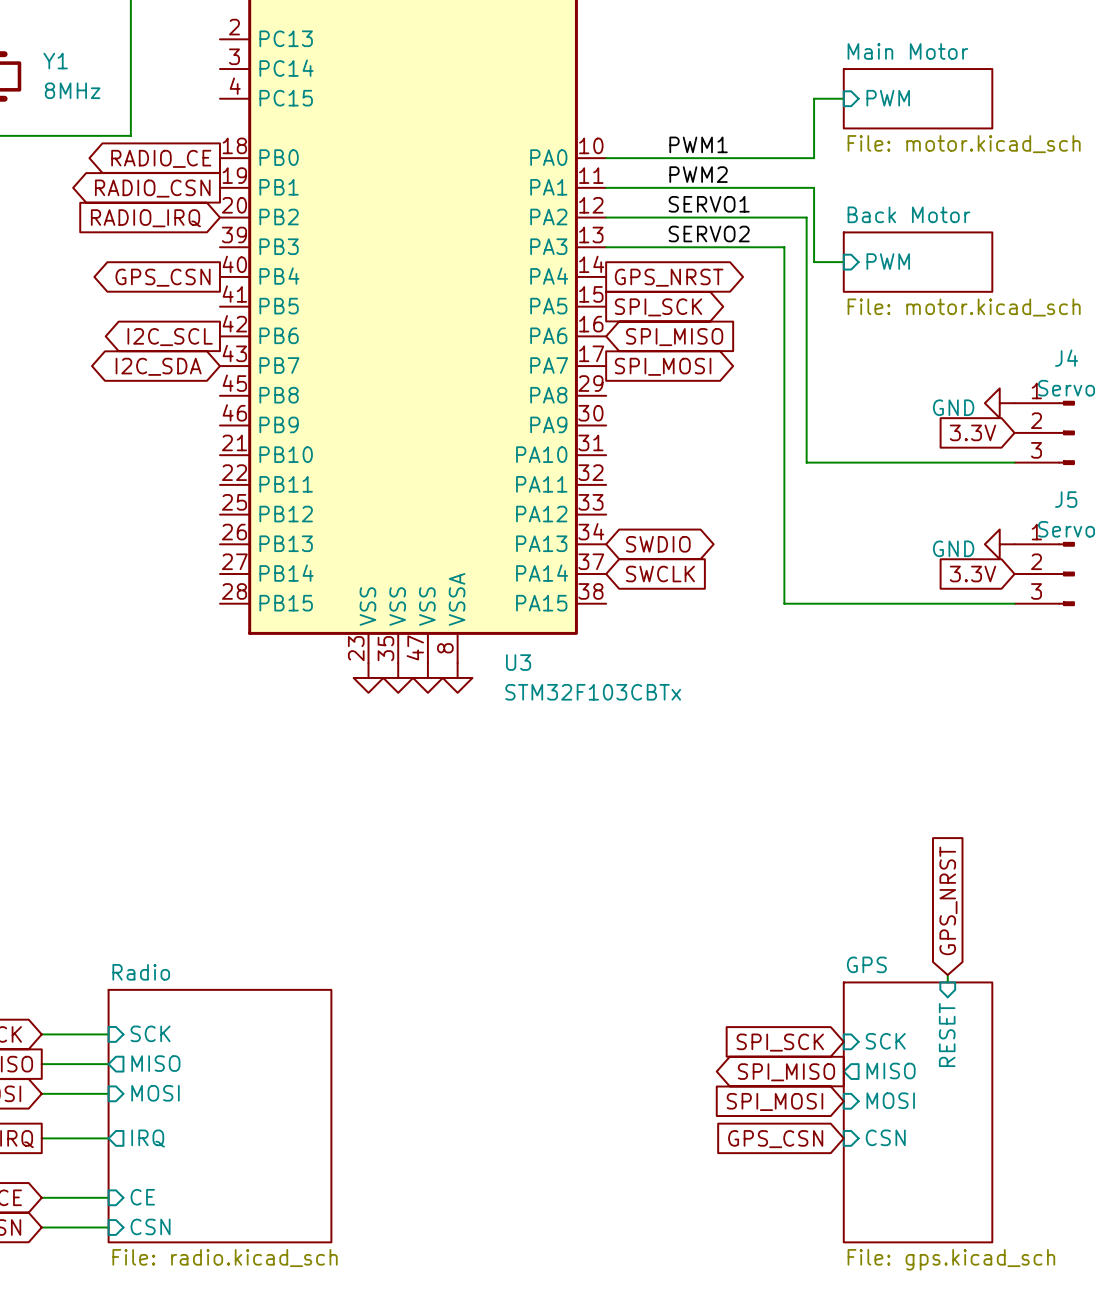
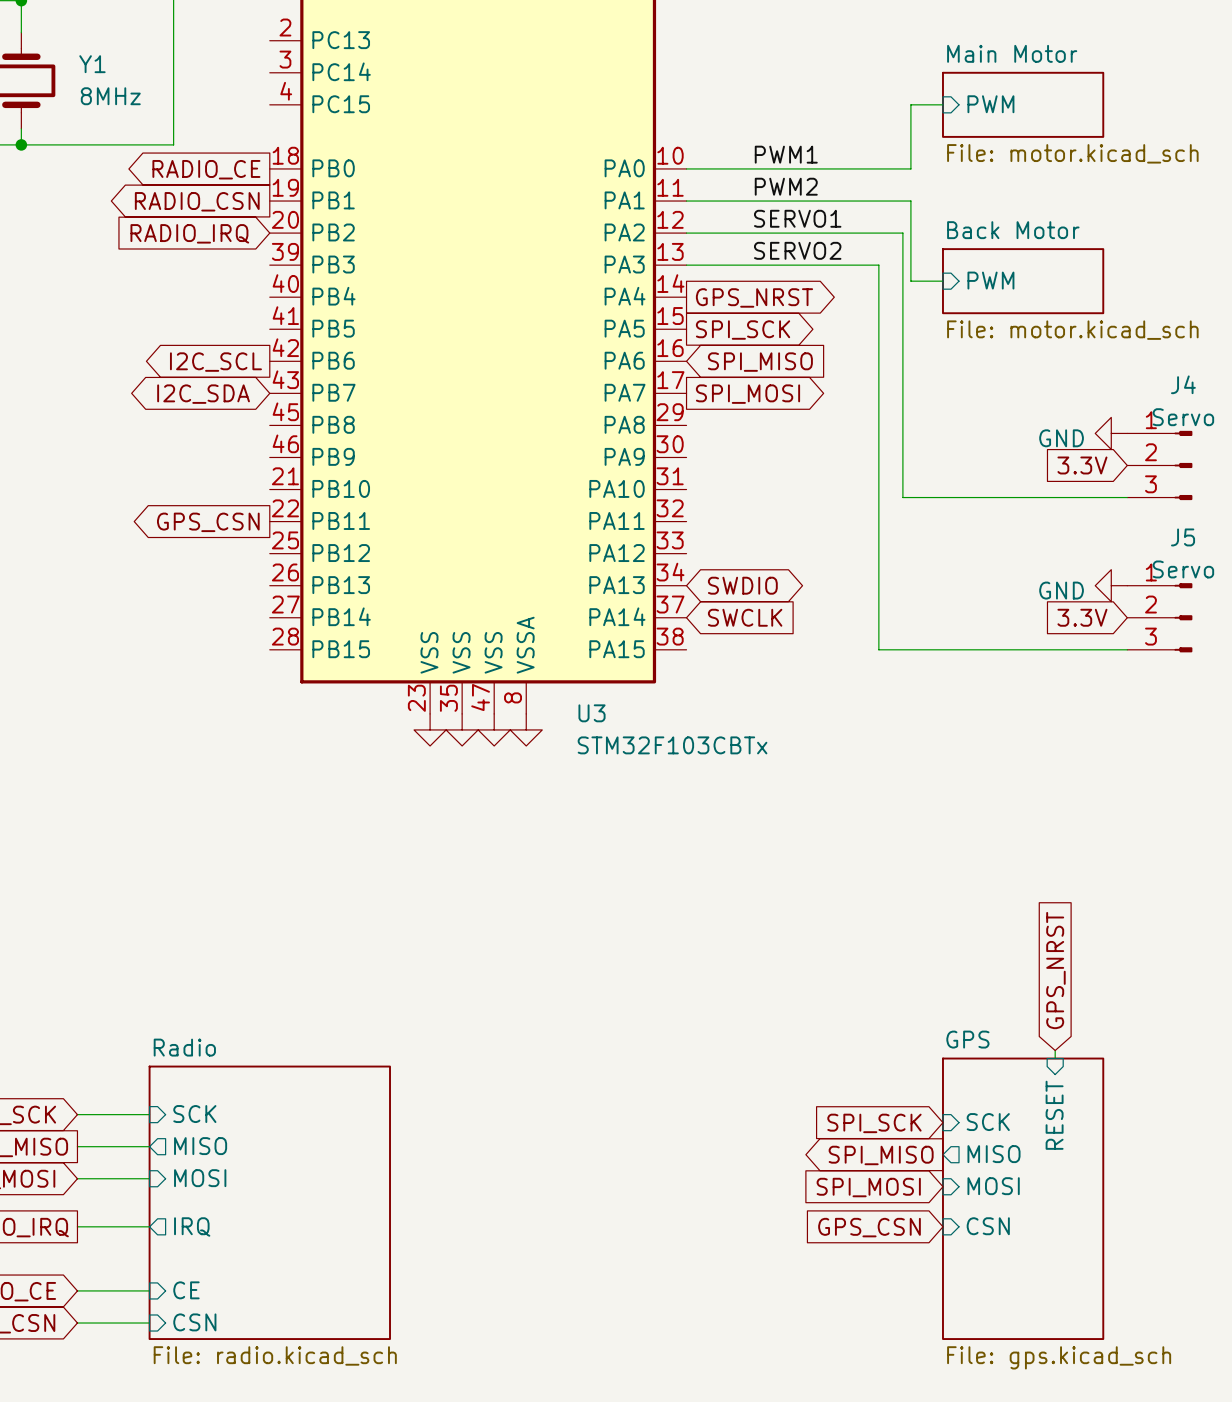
global label position: GPS_CSN (163, 277) -> GPS_CSN (208, 522)

